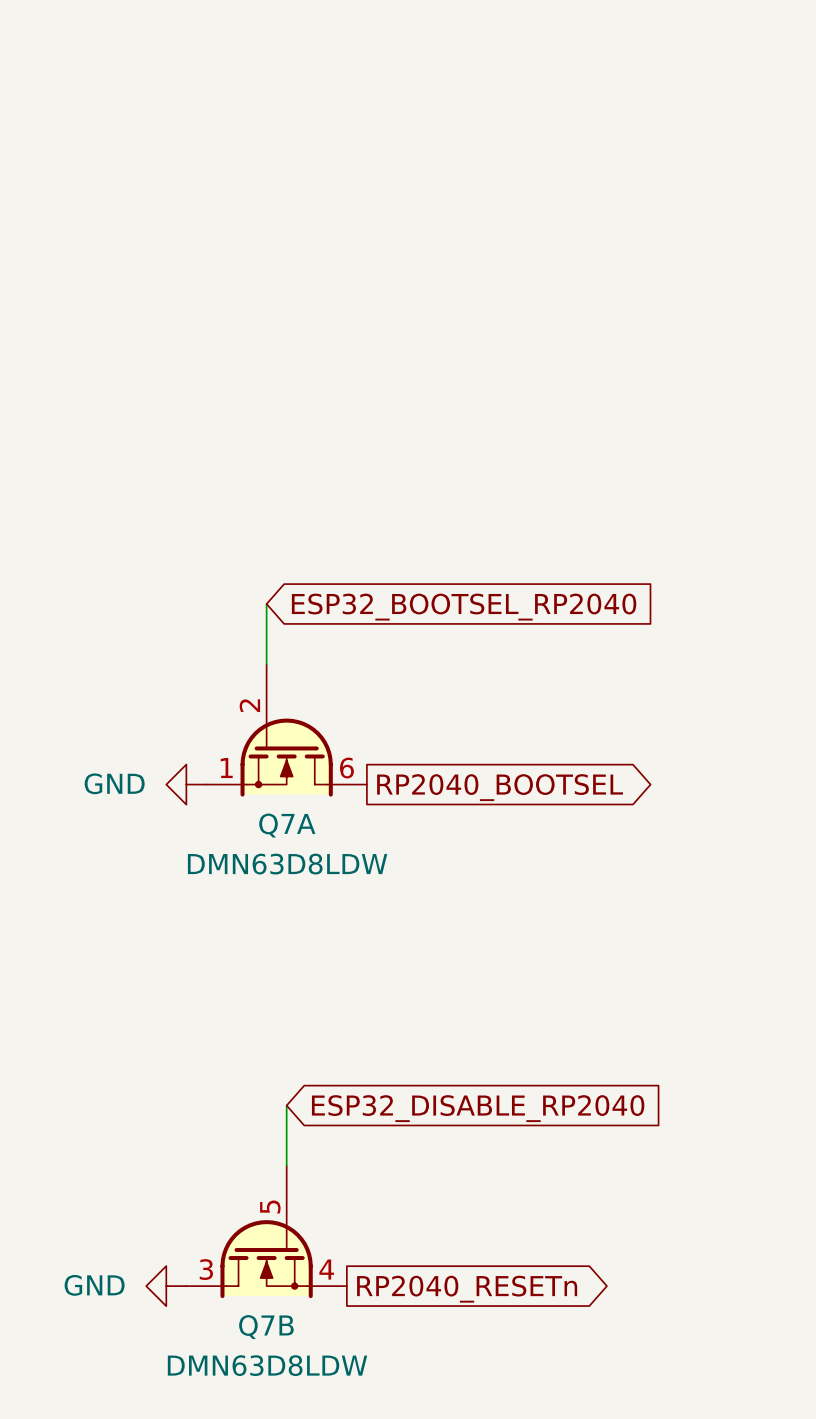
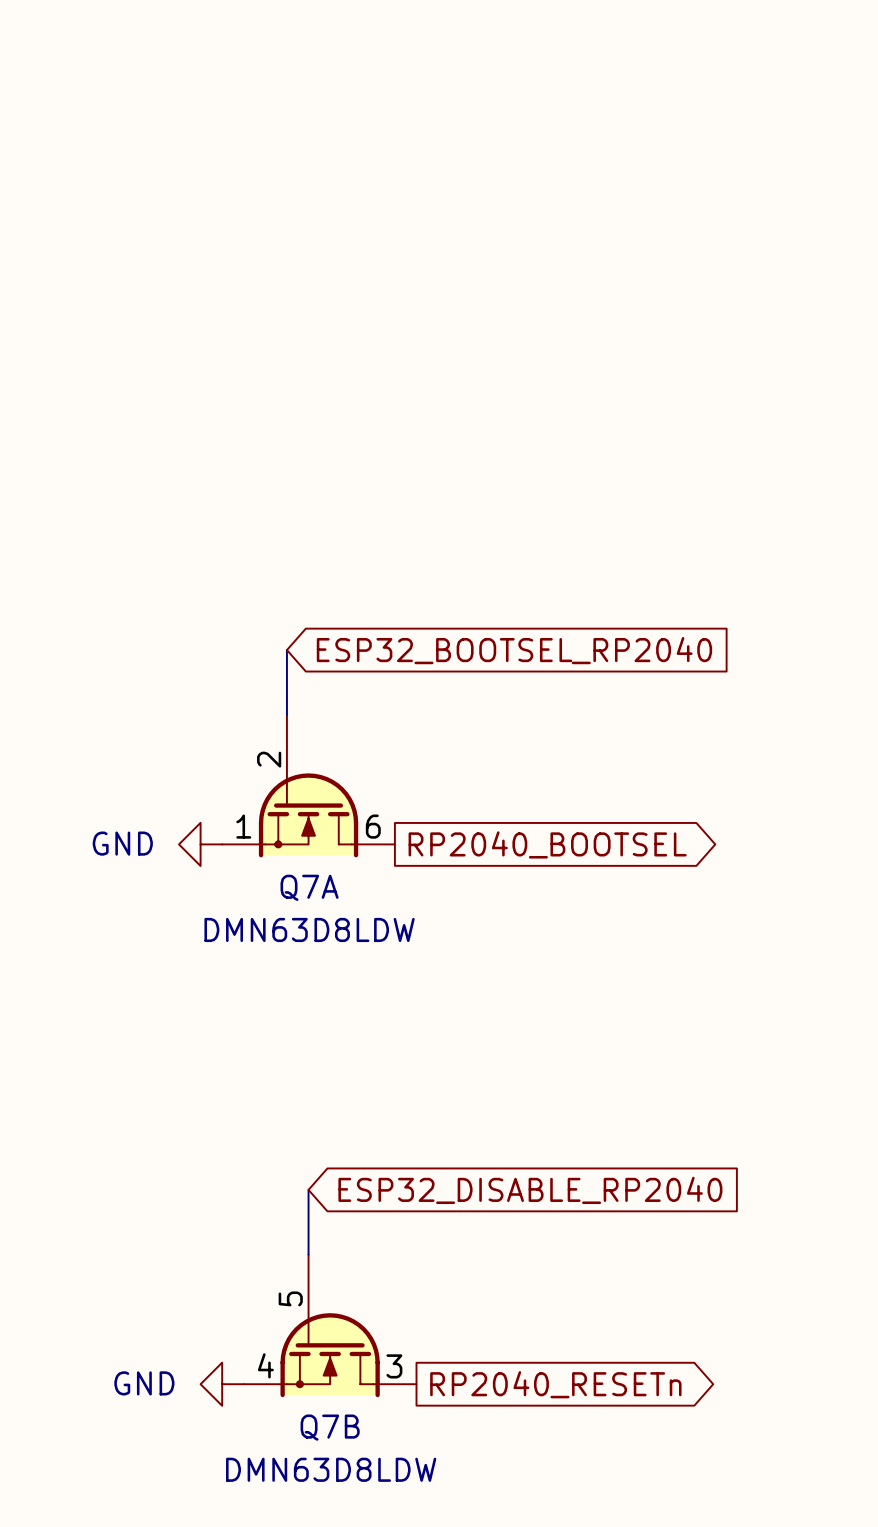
Q7B flip: as is (266, 1259) -> left-right (330, 1355)
power symbol position: GND (166, 1286) -> GND (222, 1384)
global label position: RP2040_RESETn (467, 1289) -> RP2040_RESETn (555, 1384)

